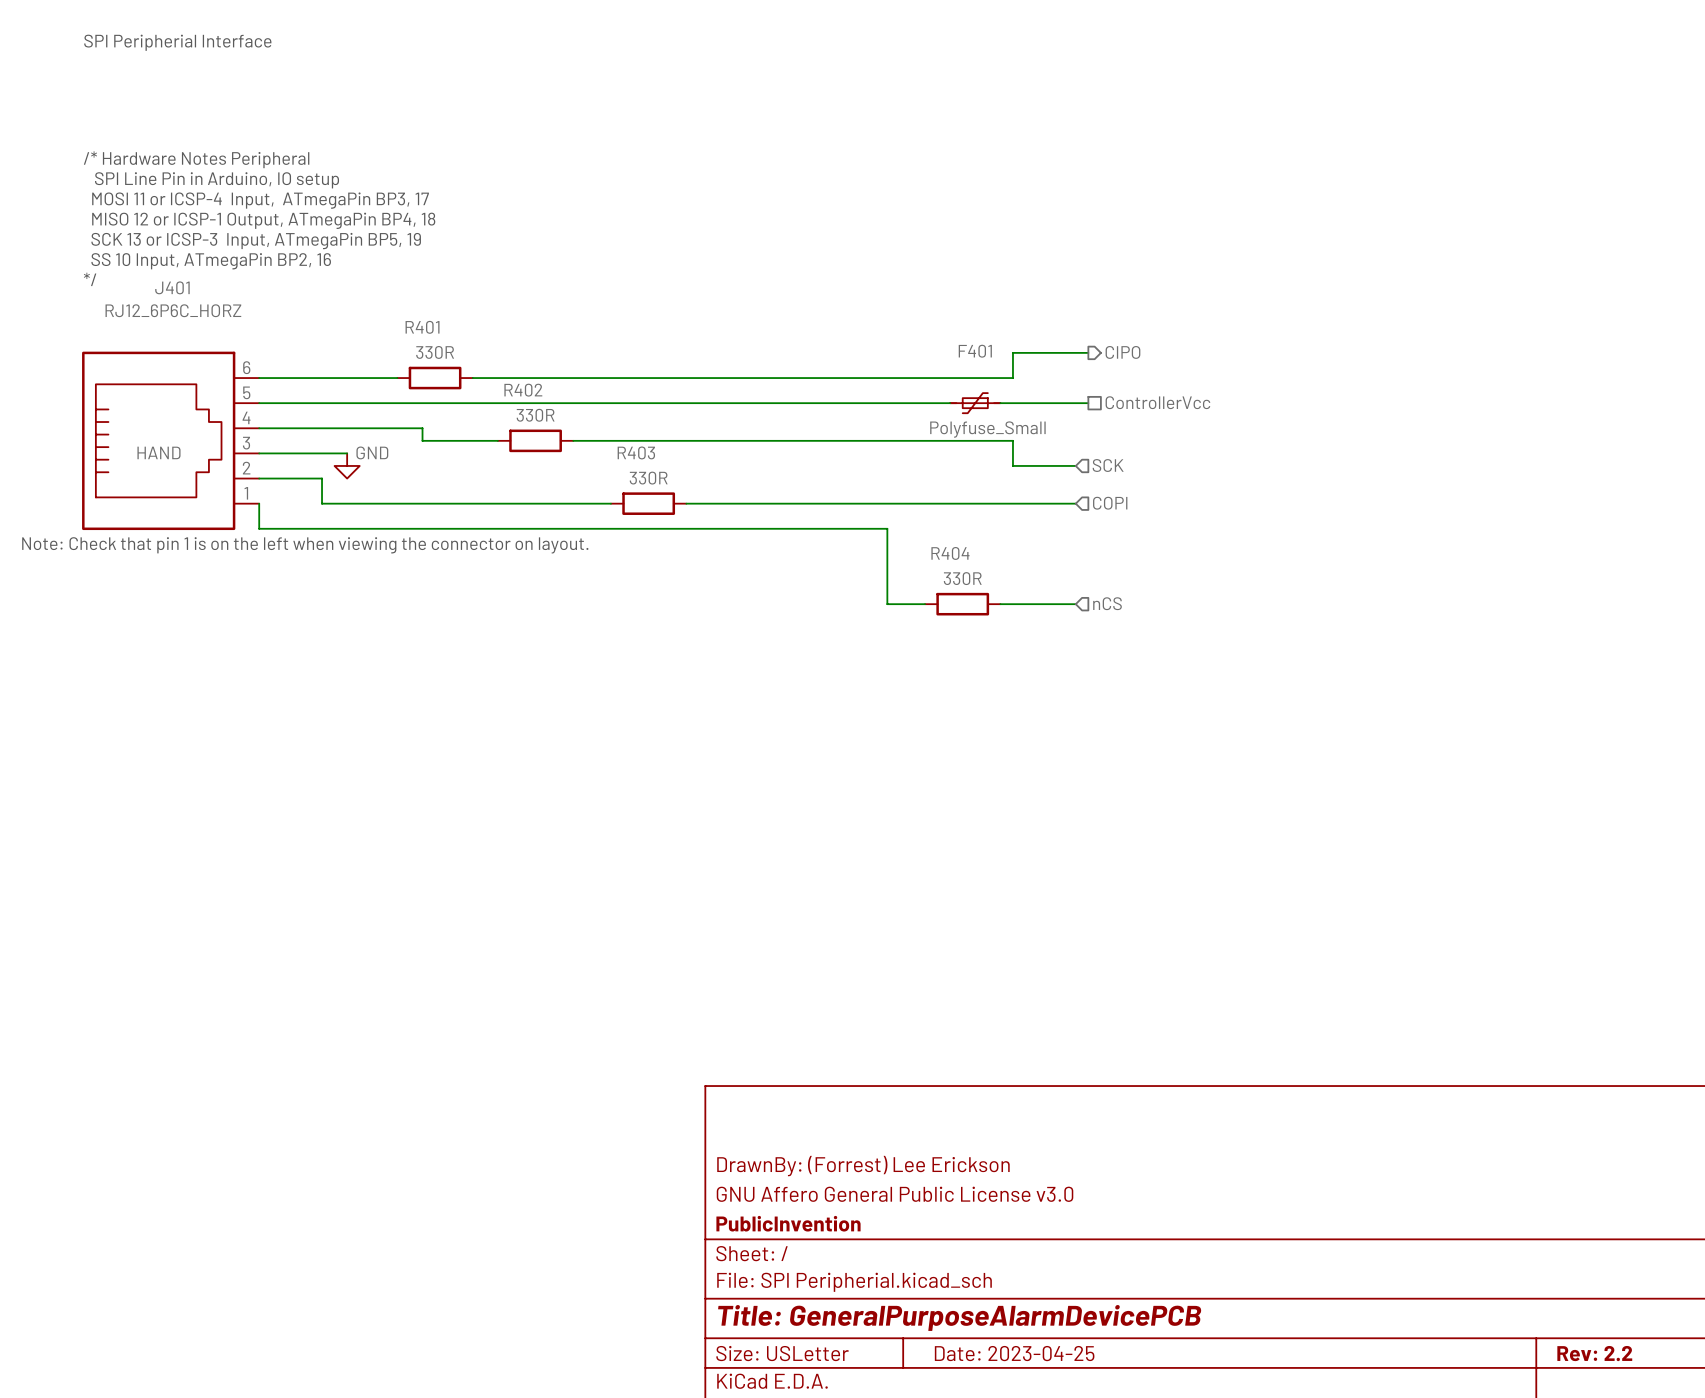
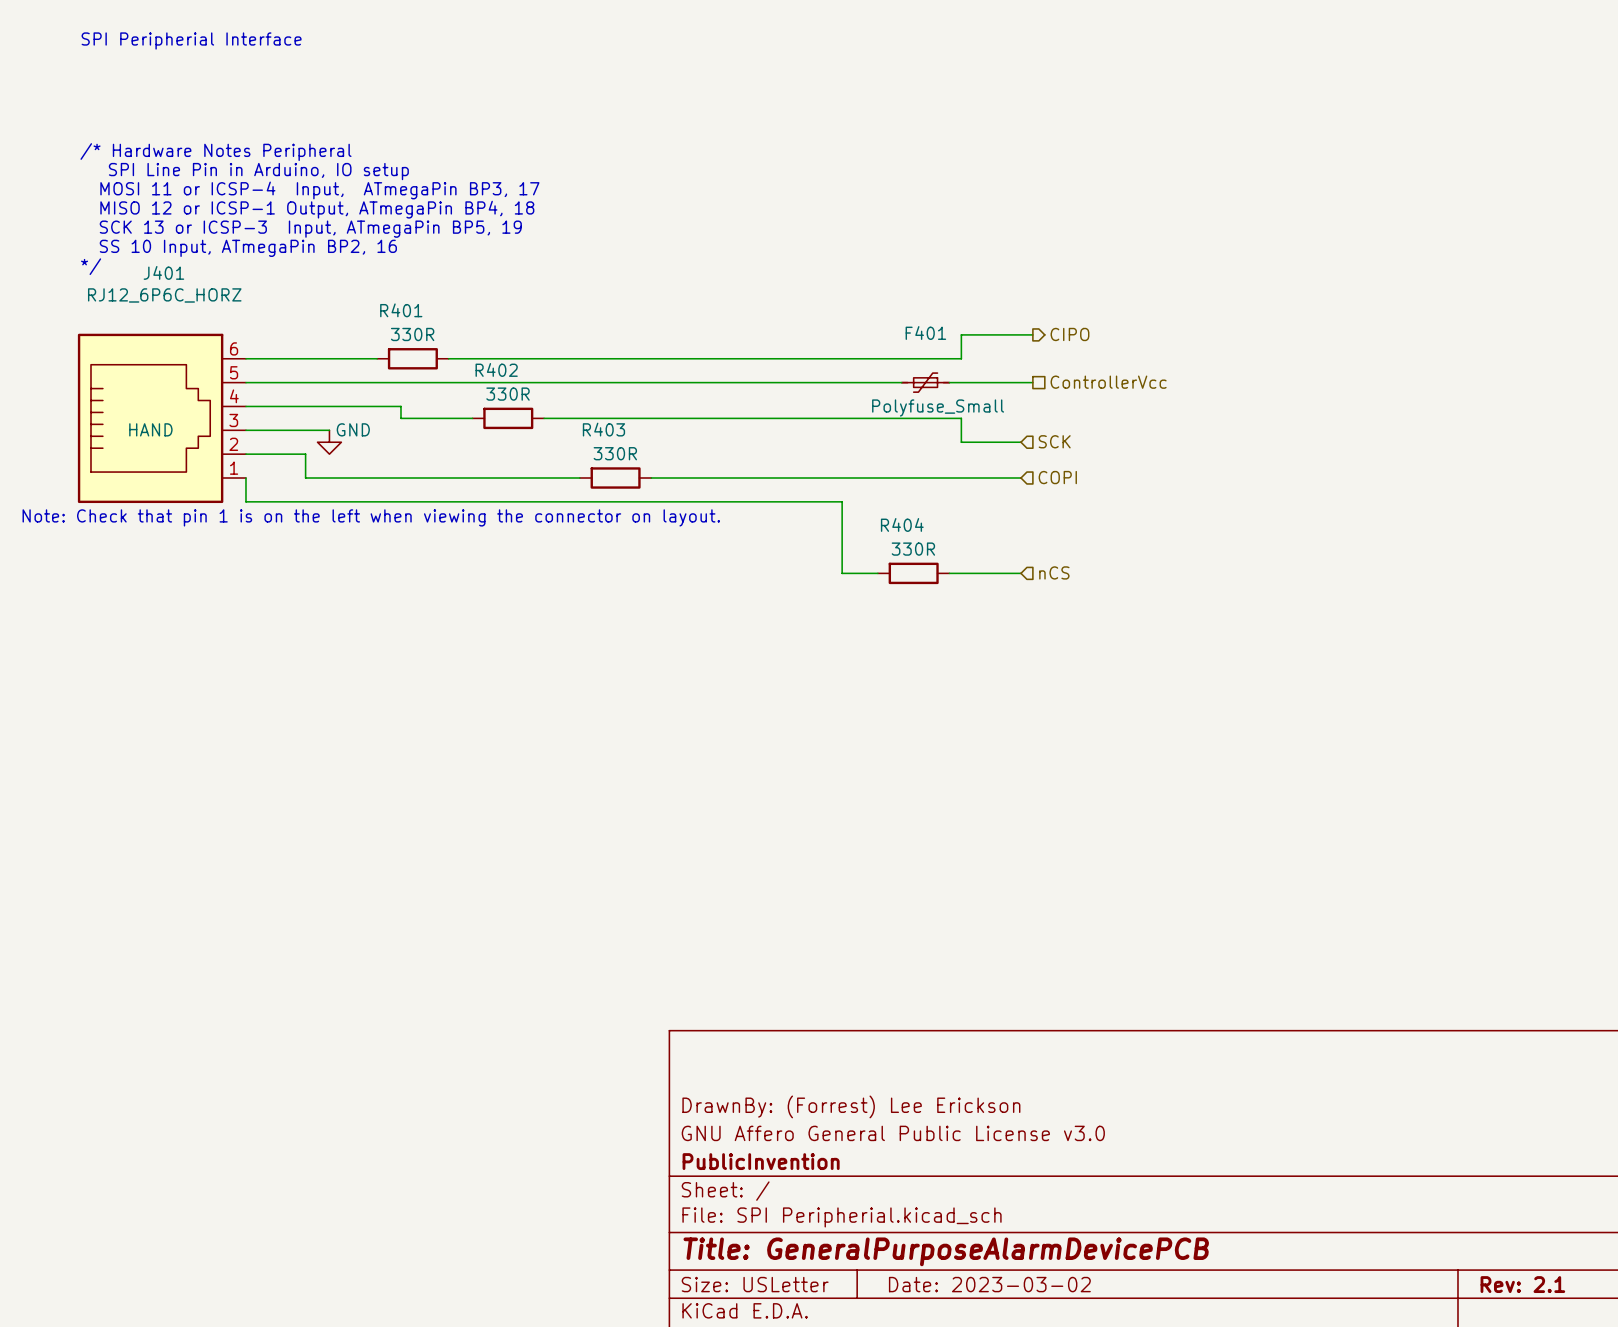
title block: Date: 2023-04-25 (1014, 1353) -> Date: 2023-03-02 (989, 1284)
title block: Rev: 2.2 (1594, 1353) -> Rev: 2.1 (1522, 1284)

